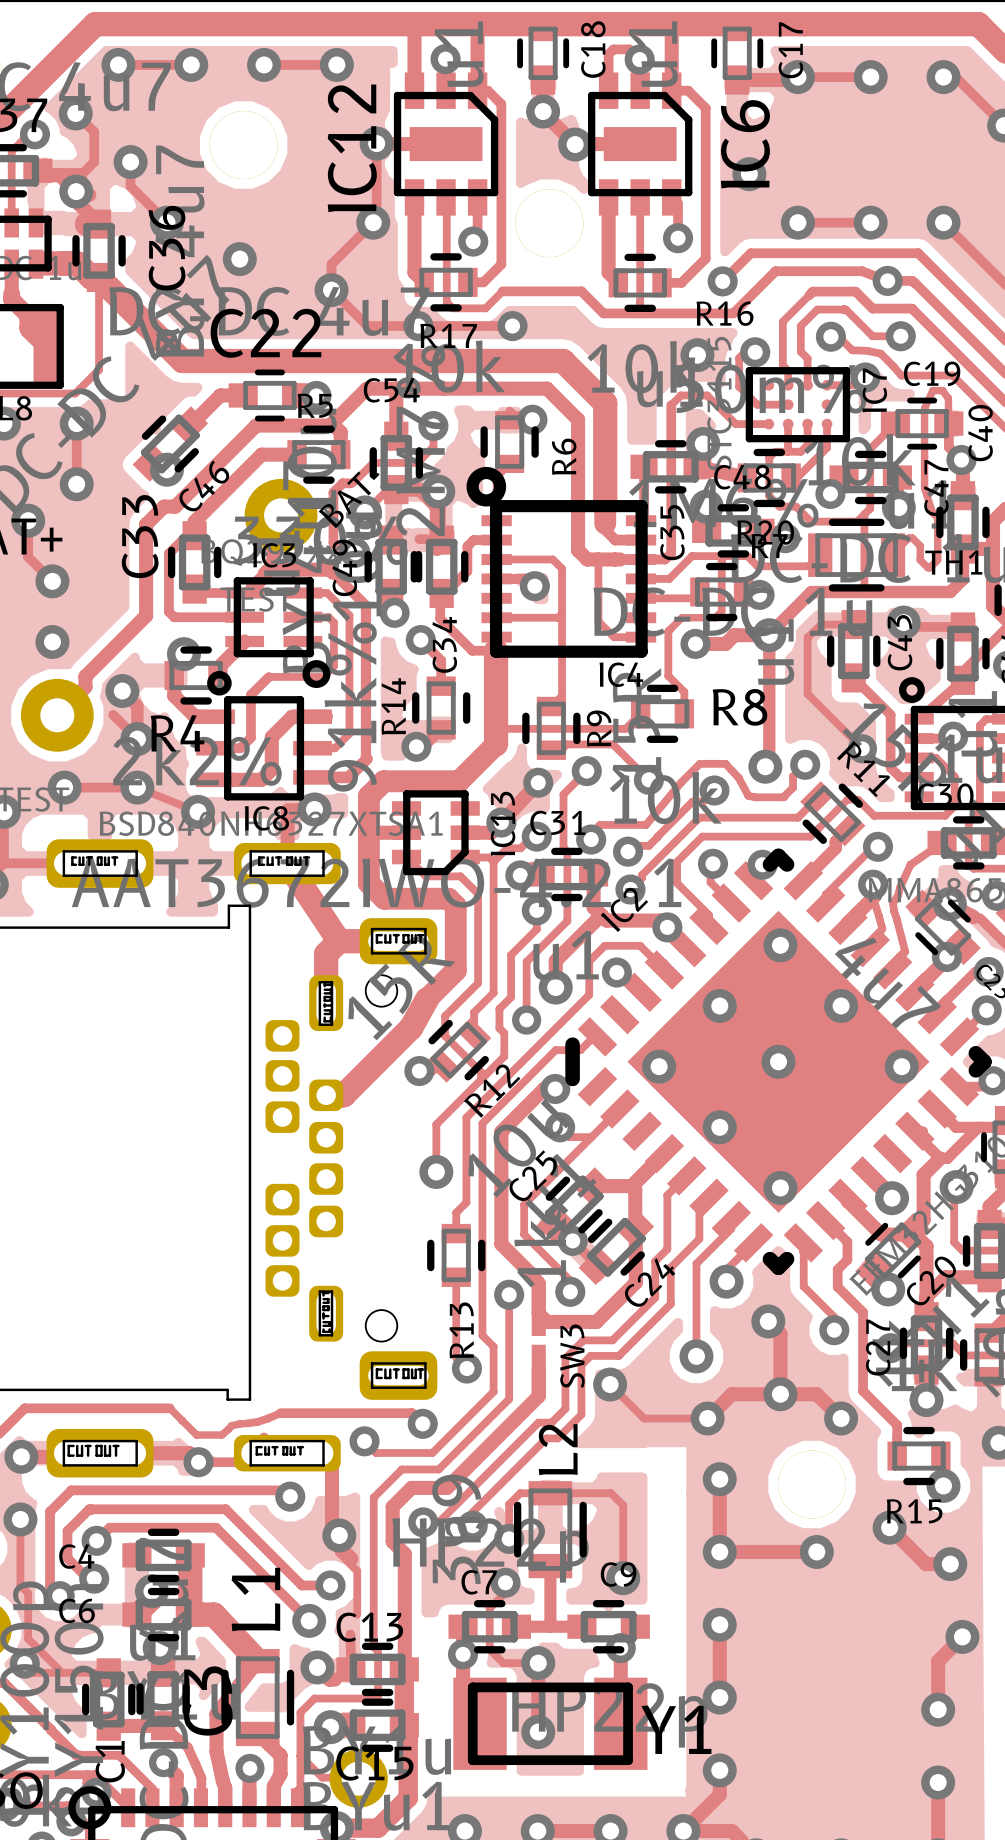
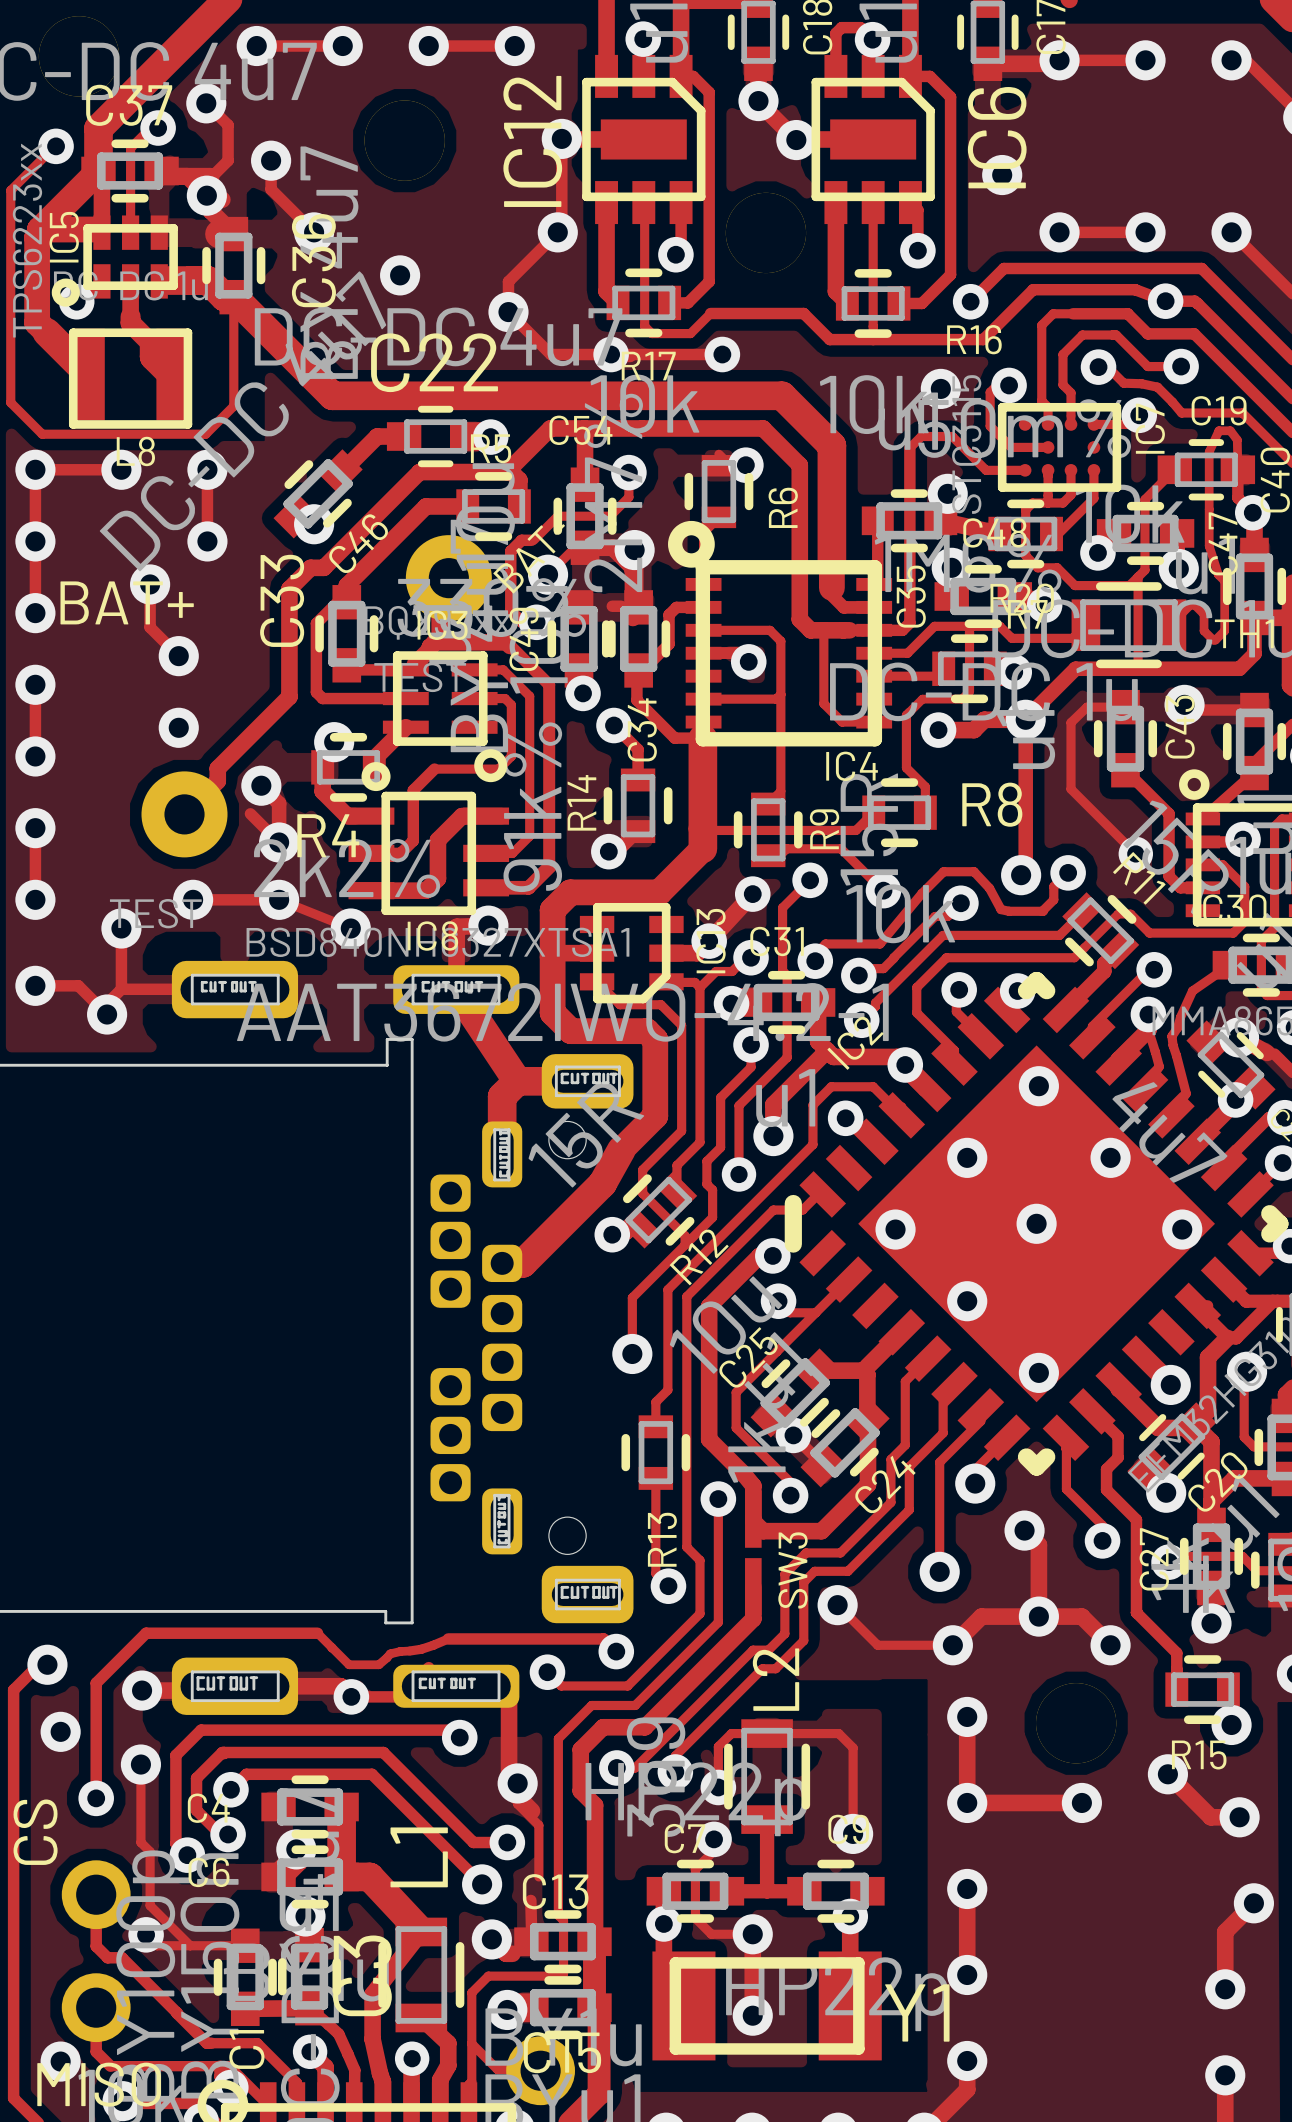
track: (812, 291) (782, 321) -> (1077, 313) (1053, 313) (1041, 325) (1041, 349)

